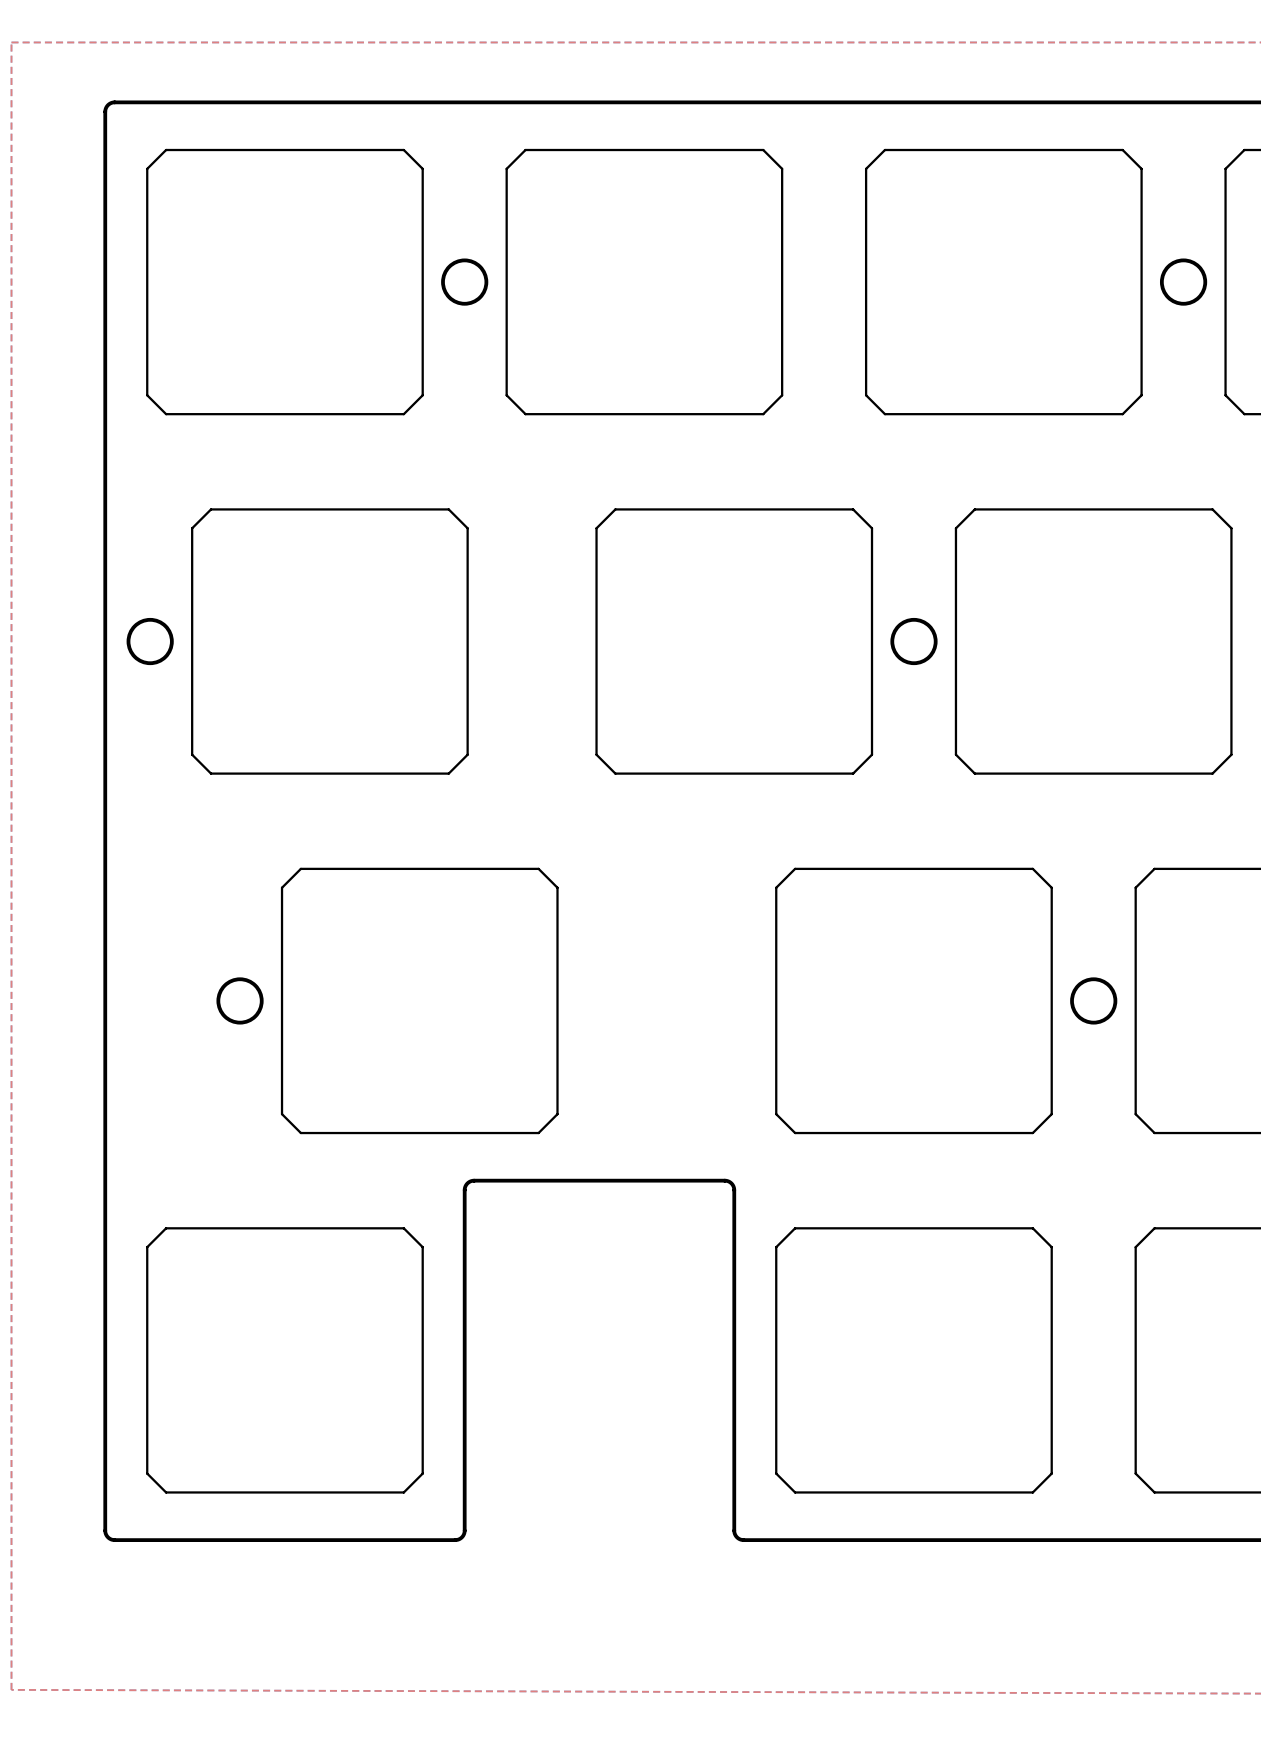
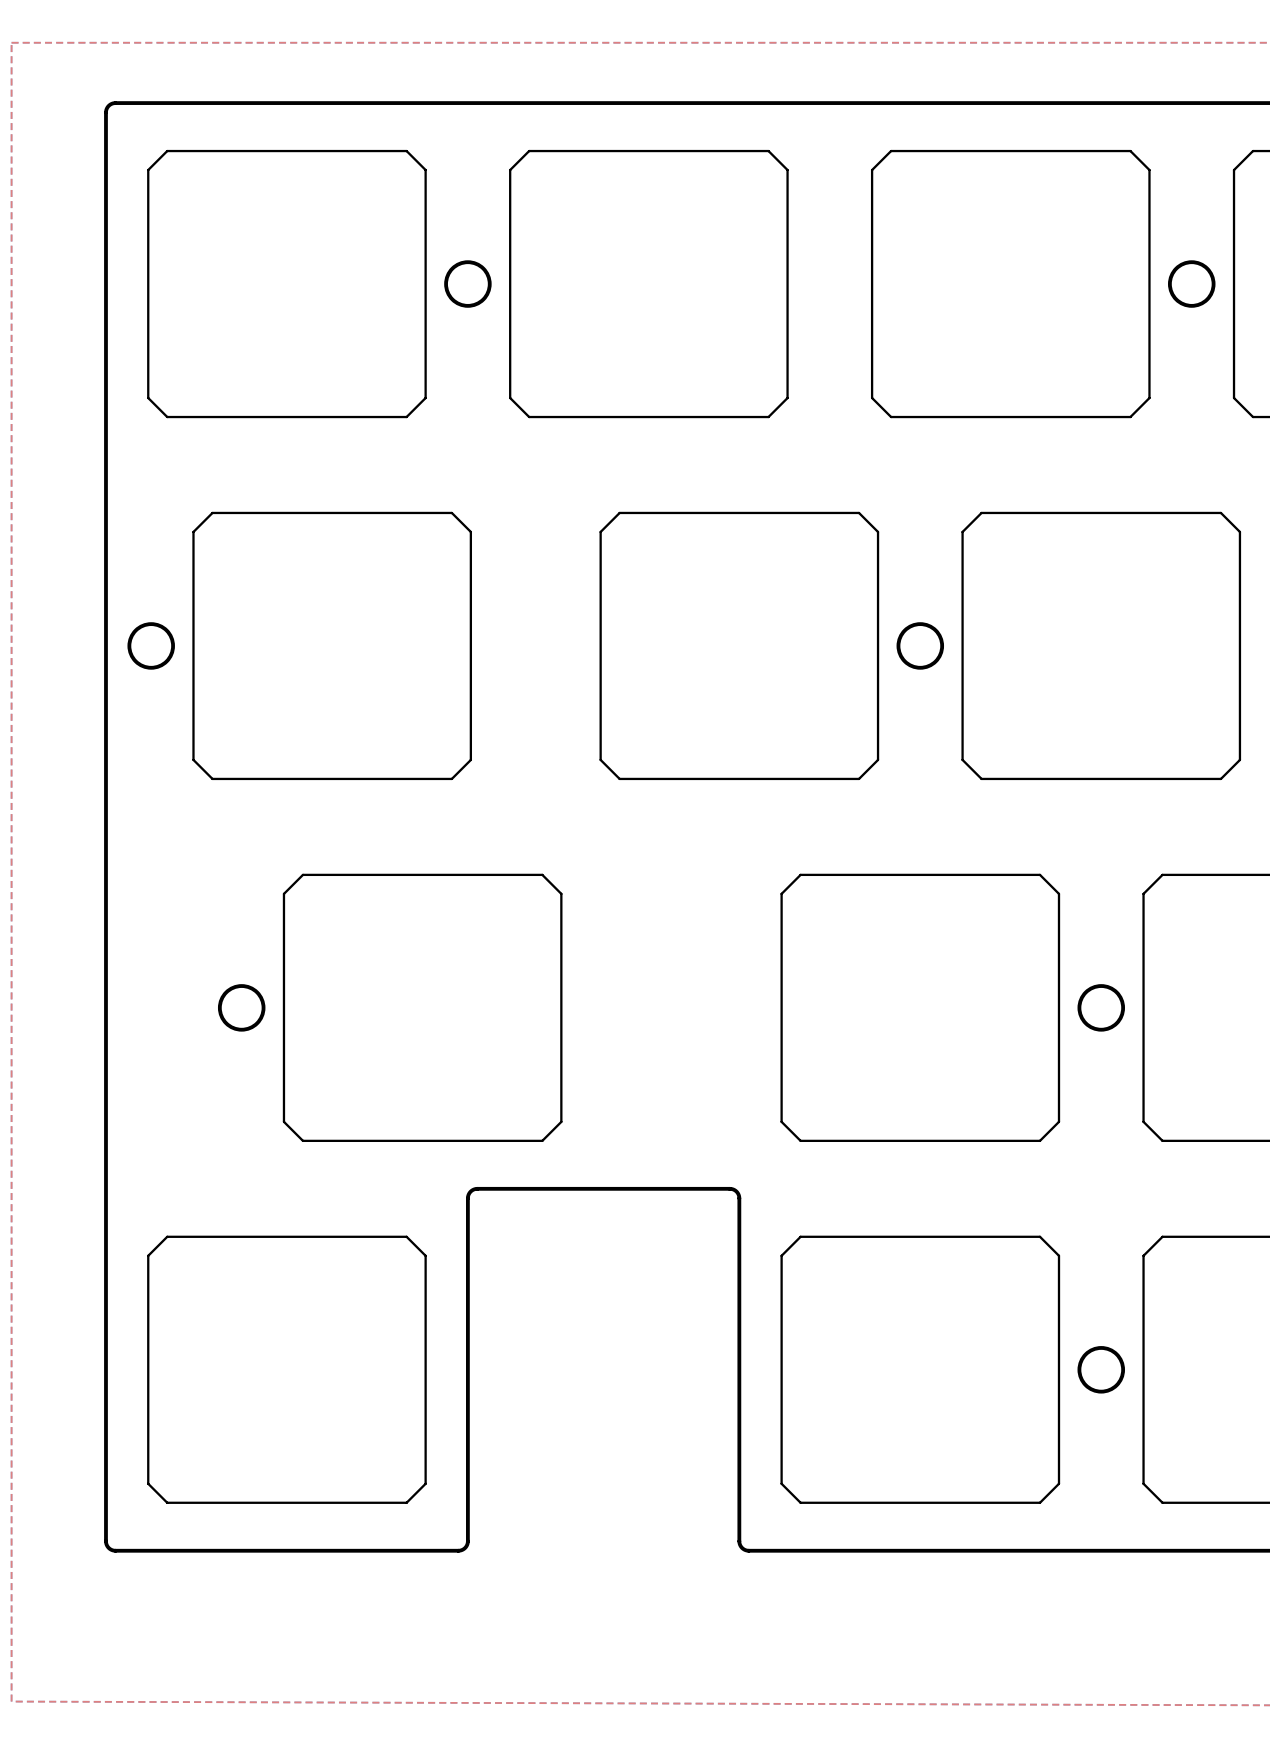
round board edge: none -> [1077, 1346, 1126, 1394]

